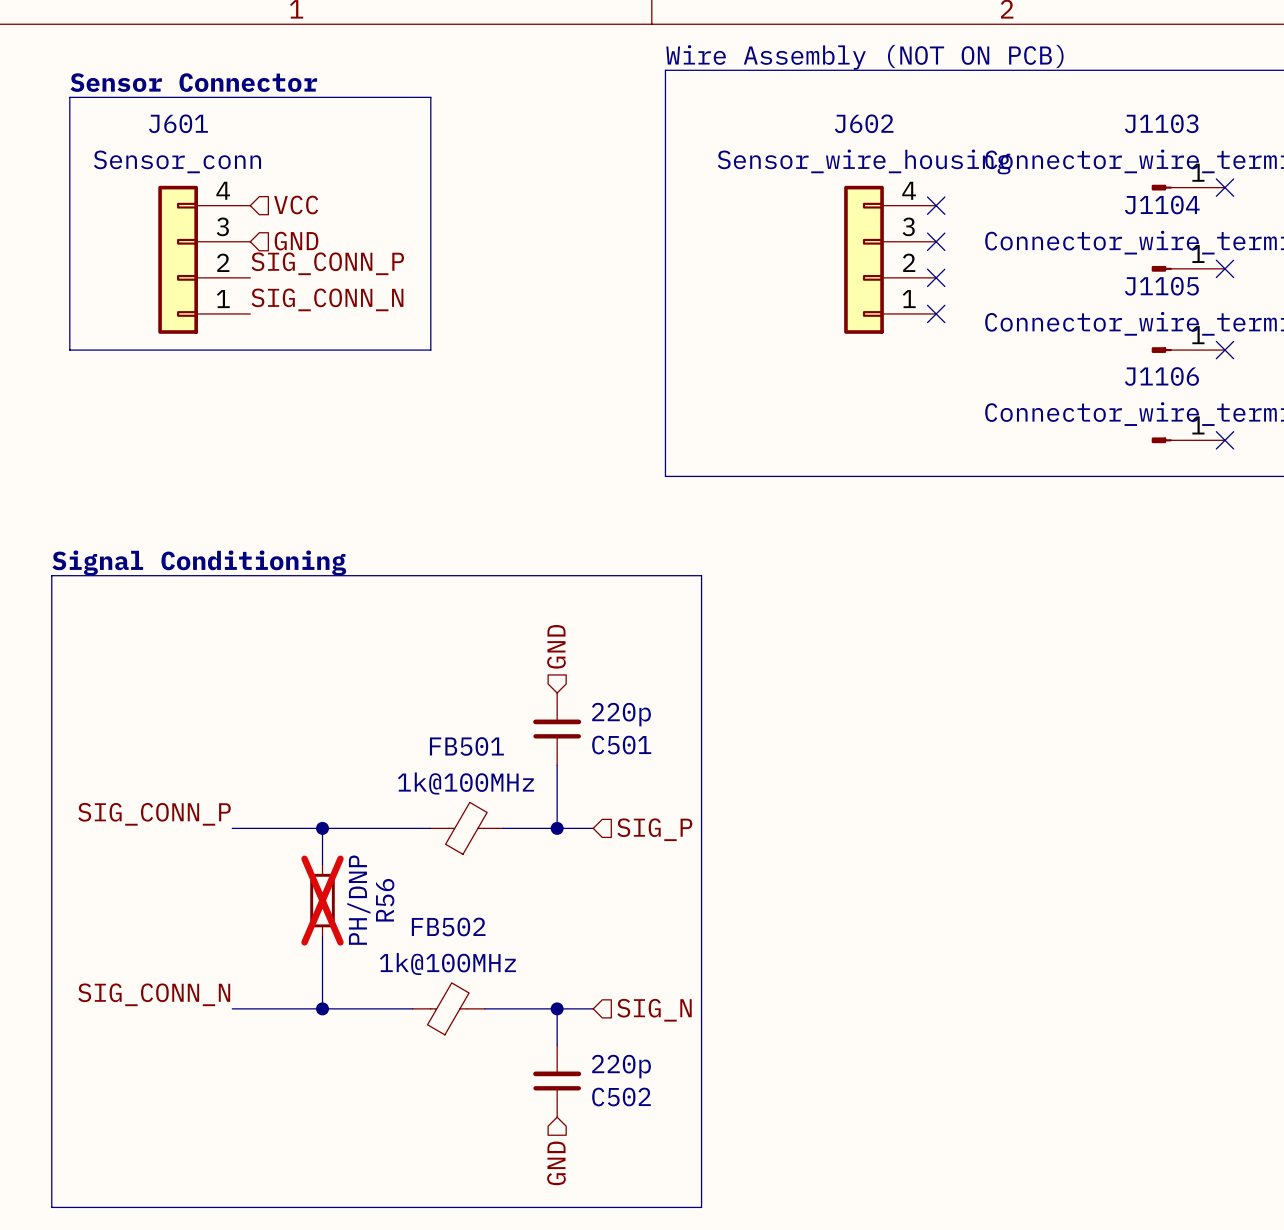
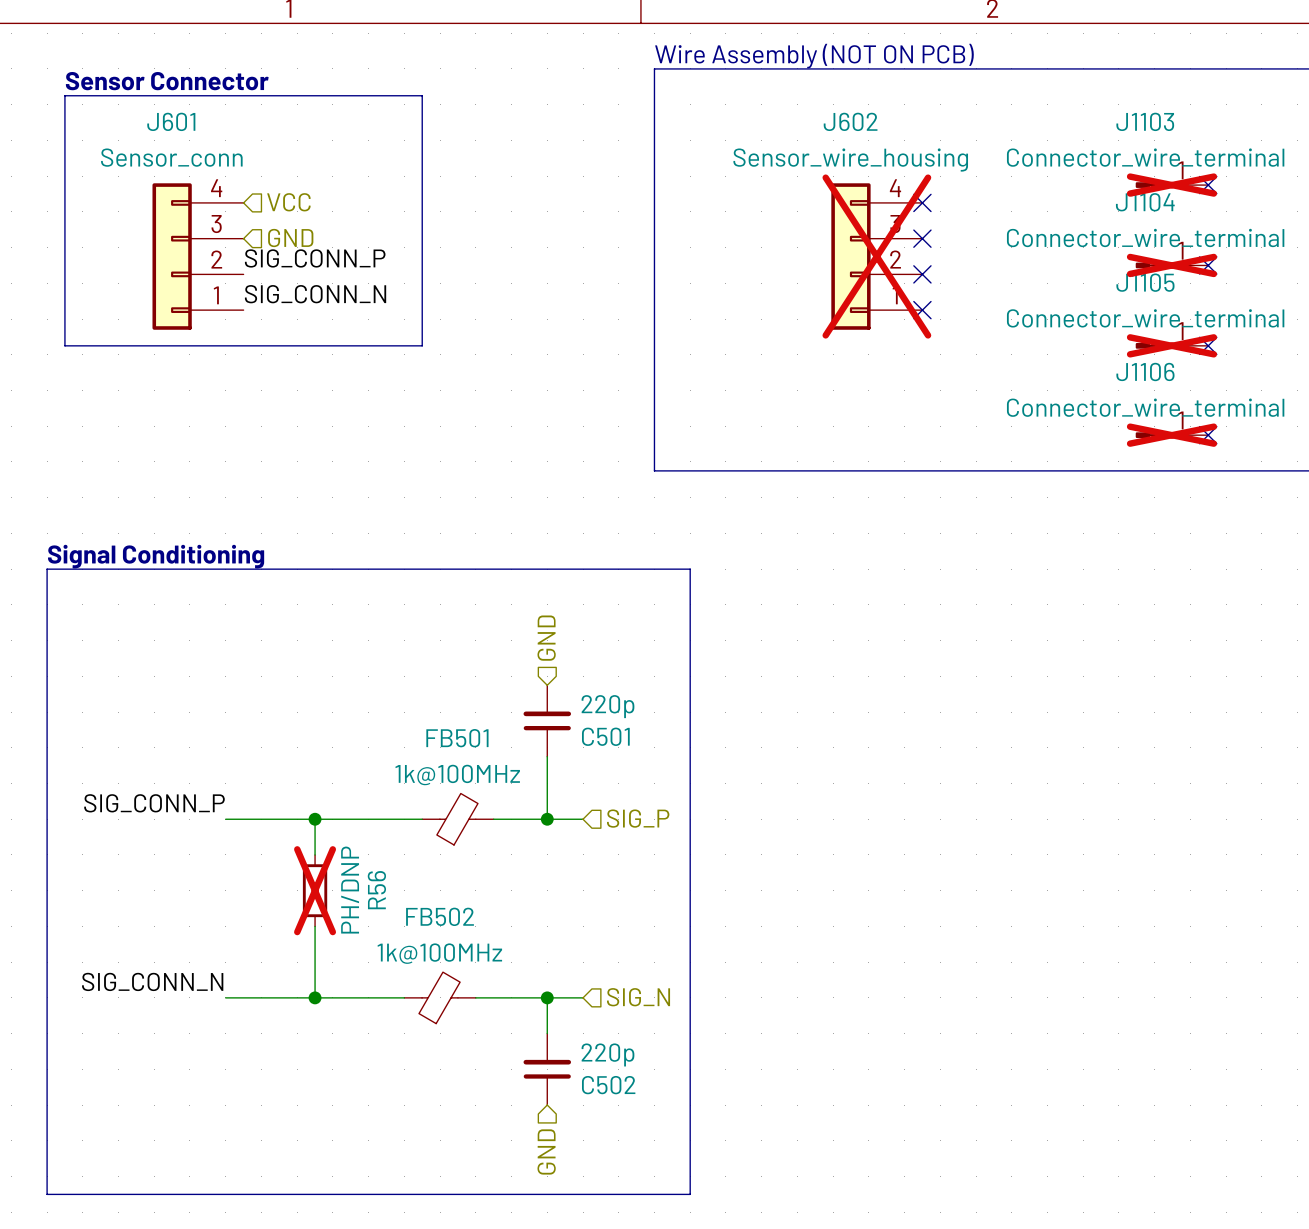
J1103 do-not-place cross: none -> (1171, 185)
J602 do-not-place cross: none -> (876, 256)
J1104 do-not-place cross: none -> (1171, 265)
J1105 do-not-place cross: none -> (1171, 345)
J1106 do-not-place cross: none -> (1171, 435)

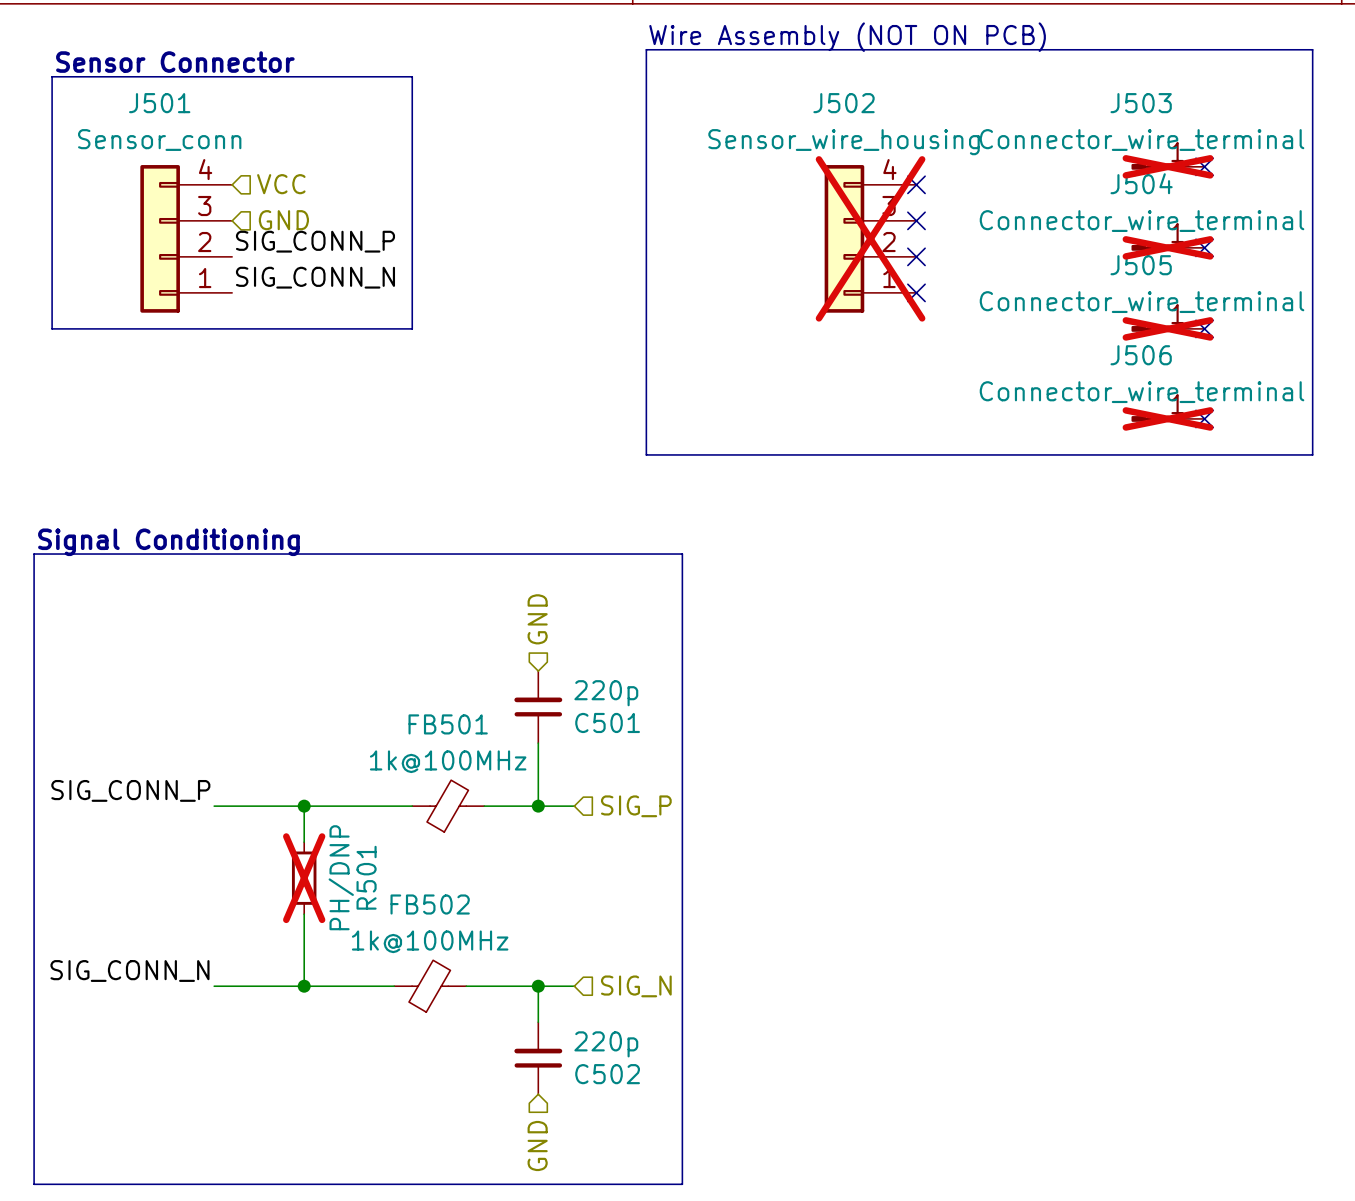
J601 name: J601 (171, 121) -> J501 (159, 103)
J602 name: J602 (850, 121) -> J502 (844, 103)
J1103 name: J1103 (1145, 121) -> J503 (1141, 103)
J1104 name: J1104 (1145, 202) -> J504 (1141, 183)
J1105 name: J1105 (1145, 282) -> J505 (1141, 265)
J1106 name: J1106 (1145, 371) -> J506 (1141, 355)
R56 name: R56 (376, 890) -> R501 (366, 877)

